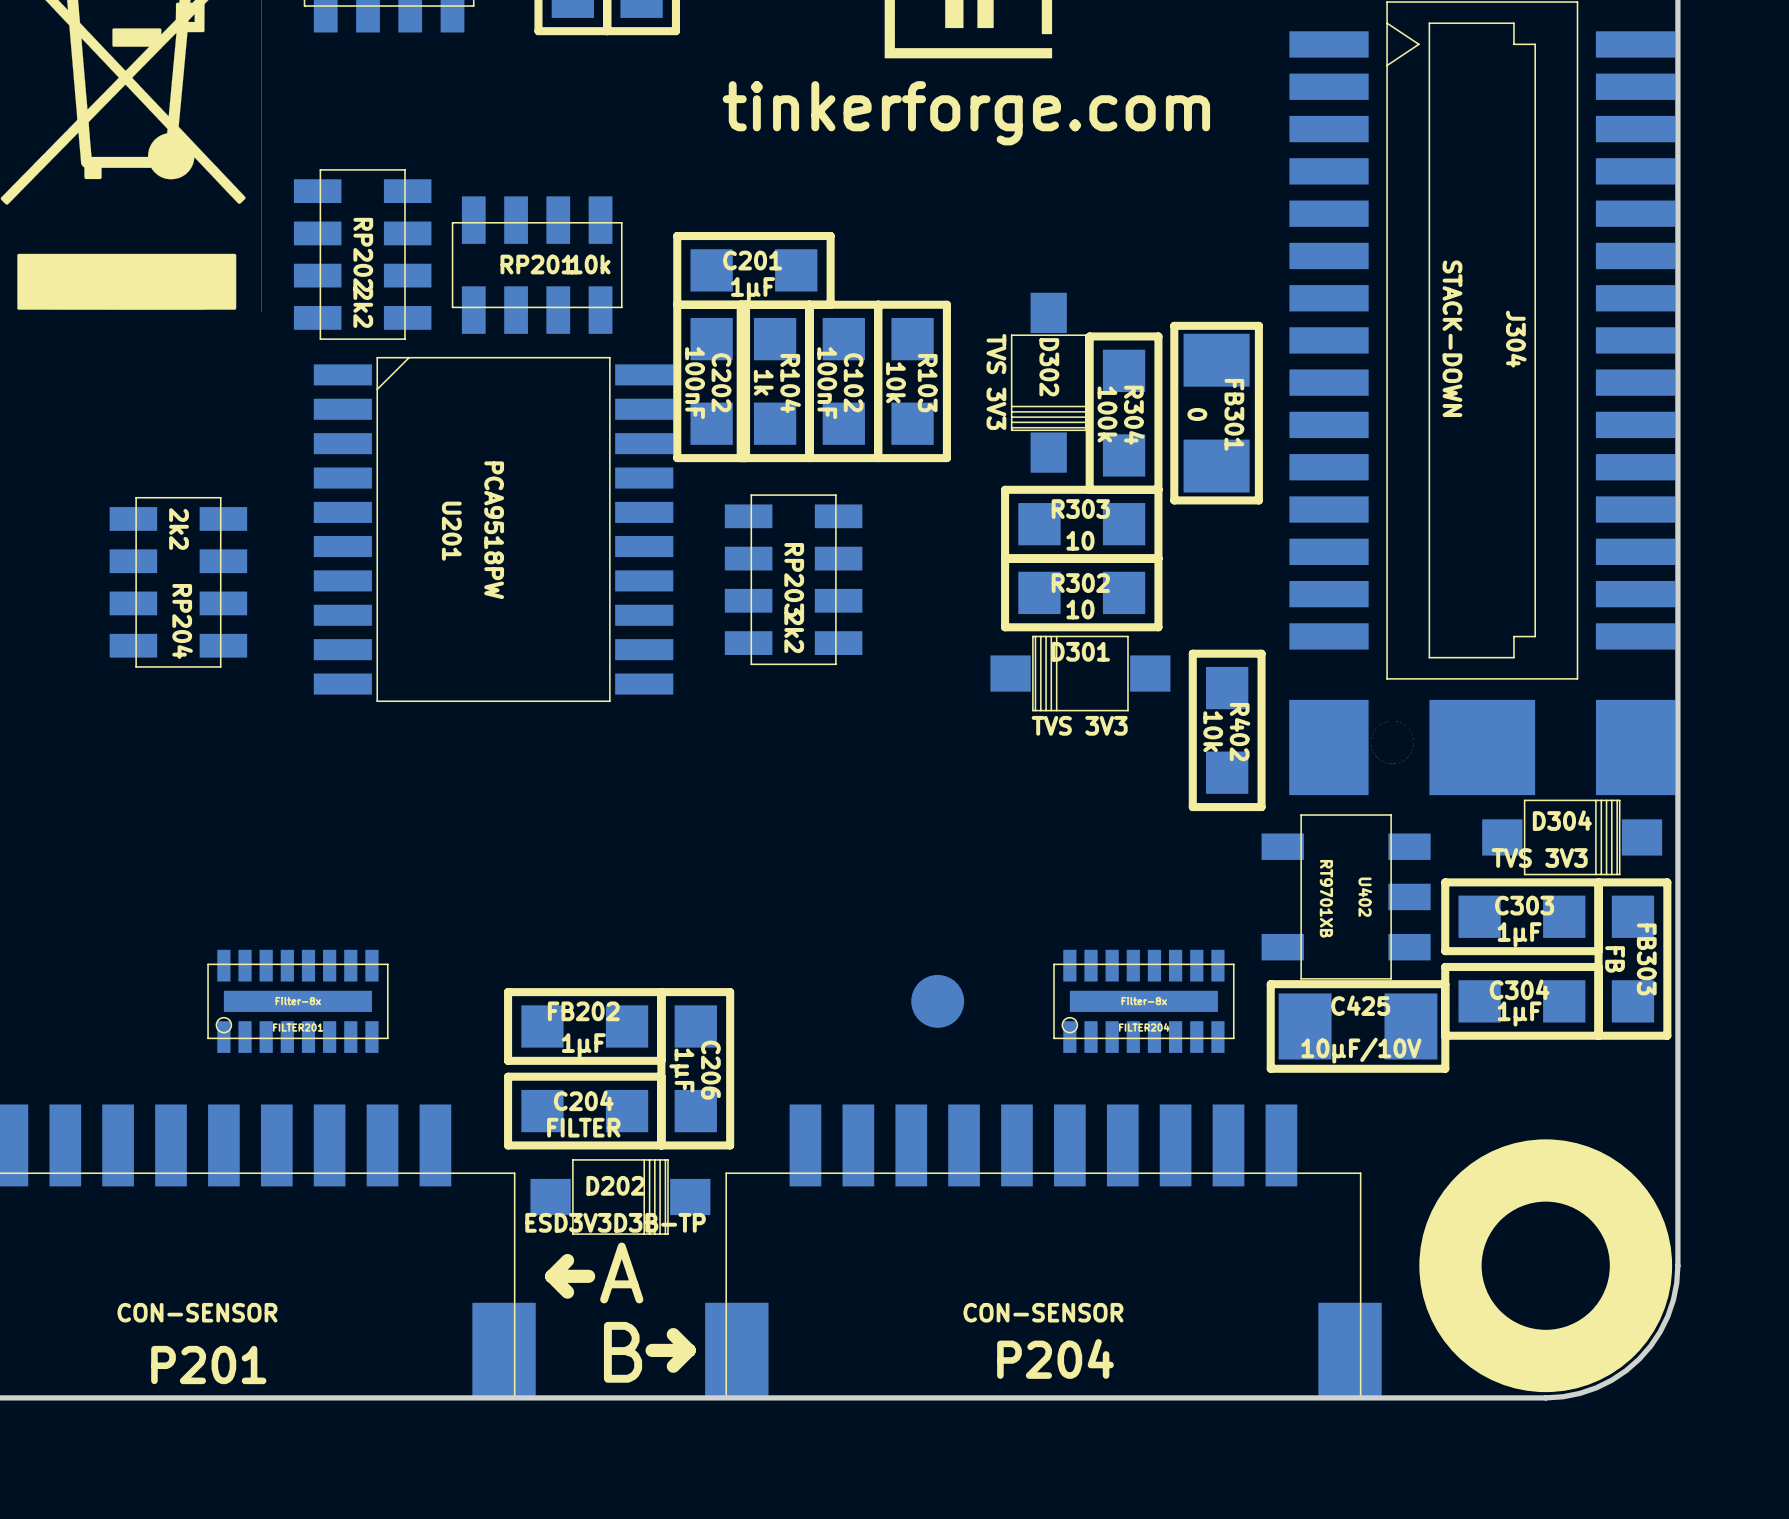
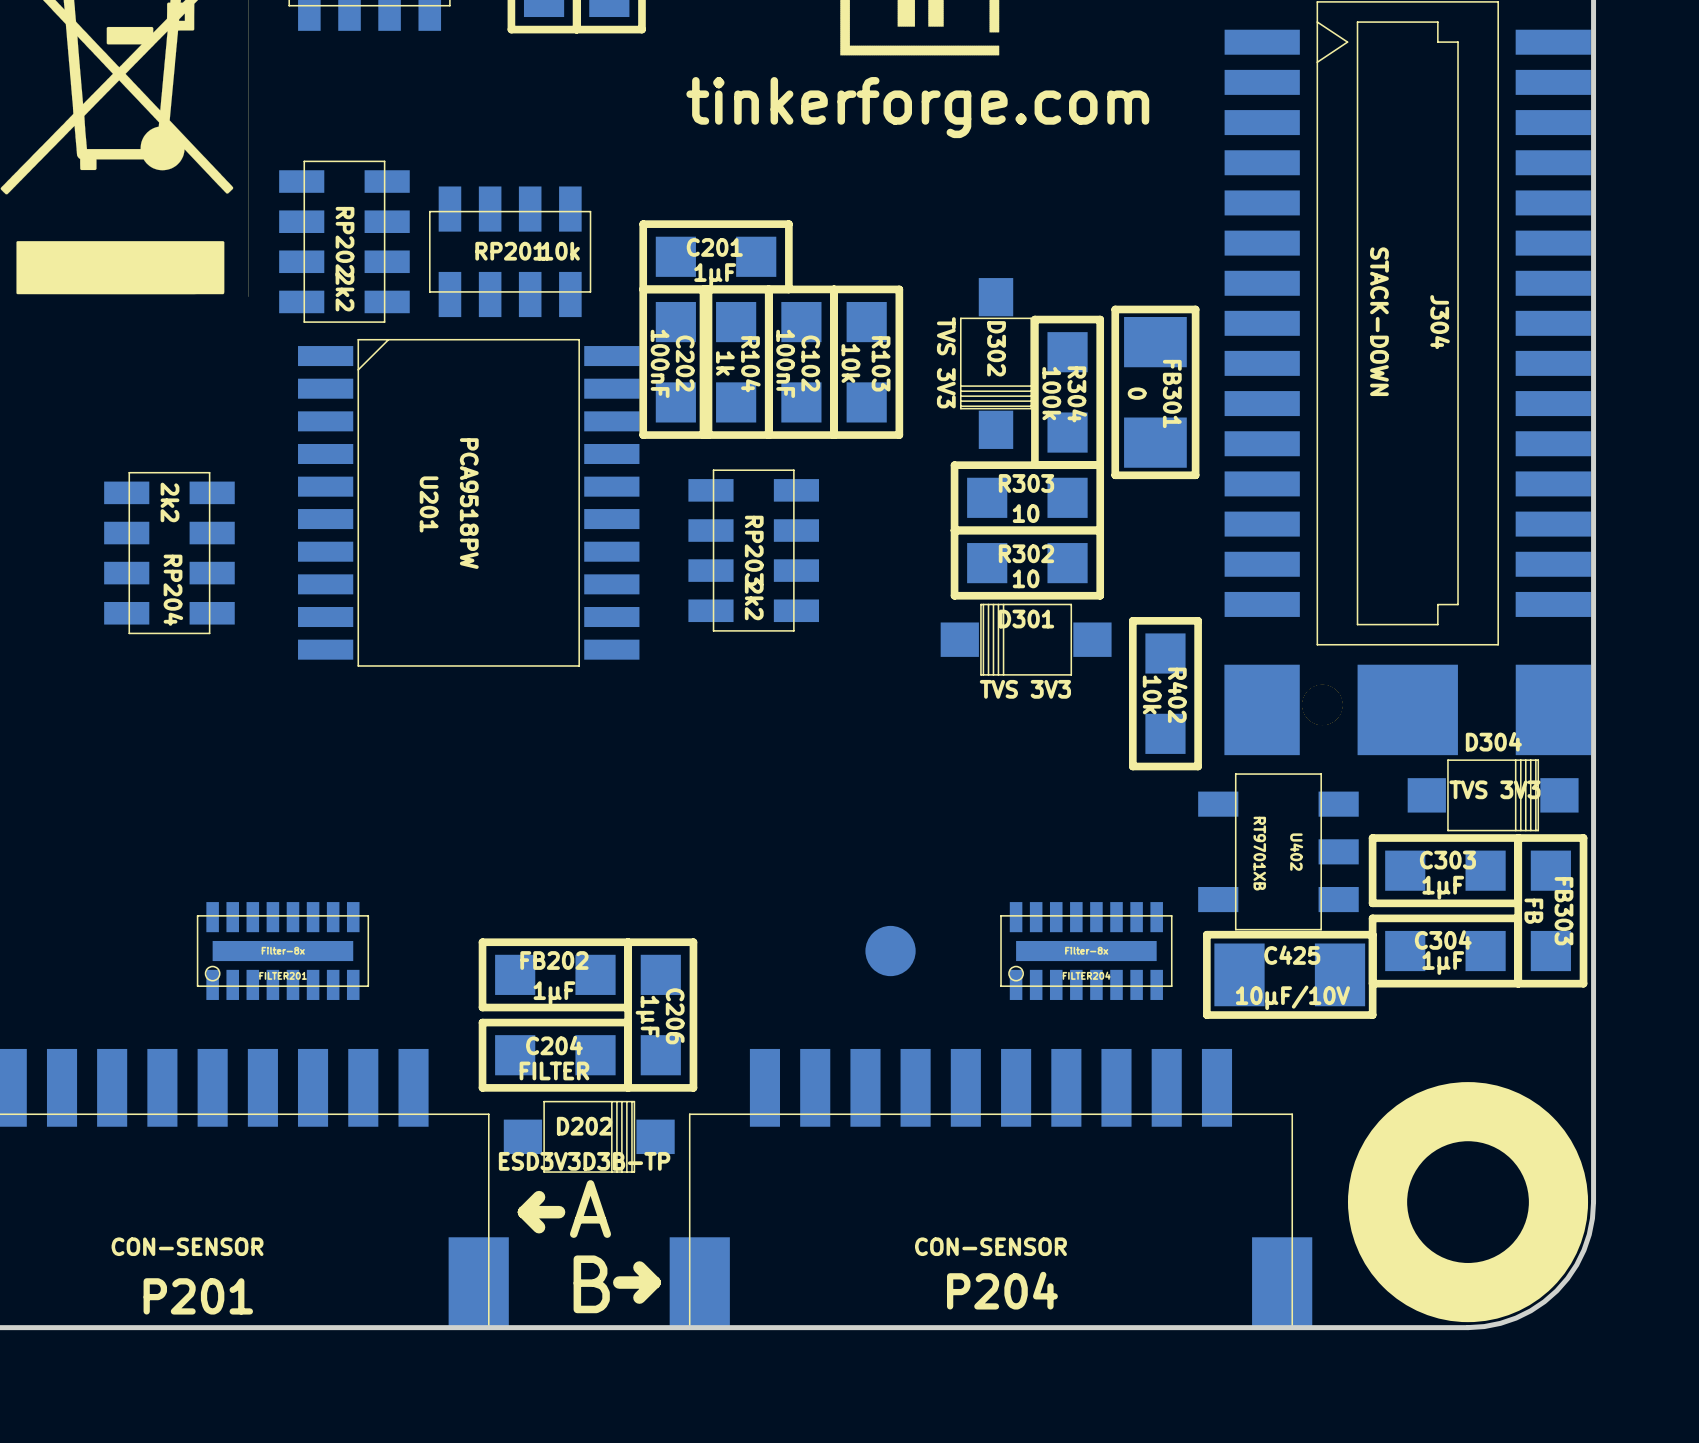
D304 name position: D304 (1562, 820) -> D304 (1493, 741)
D304 value position: TVS 3V3 (1539, 858) -> TVS 3V3 (1494, 789)

